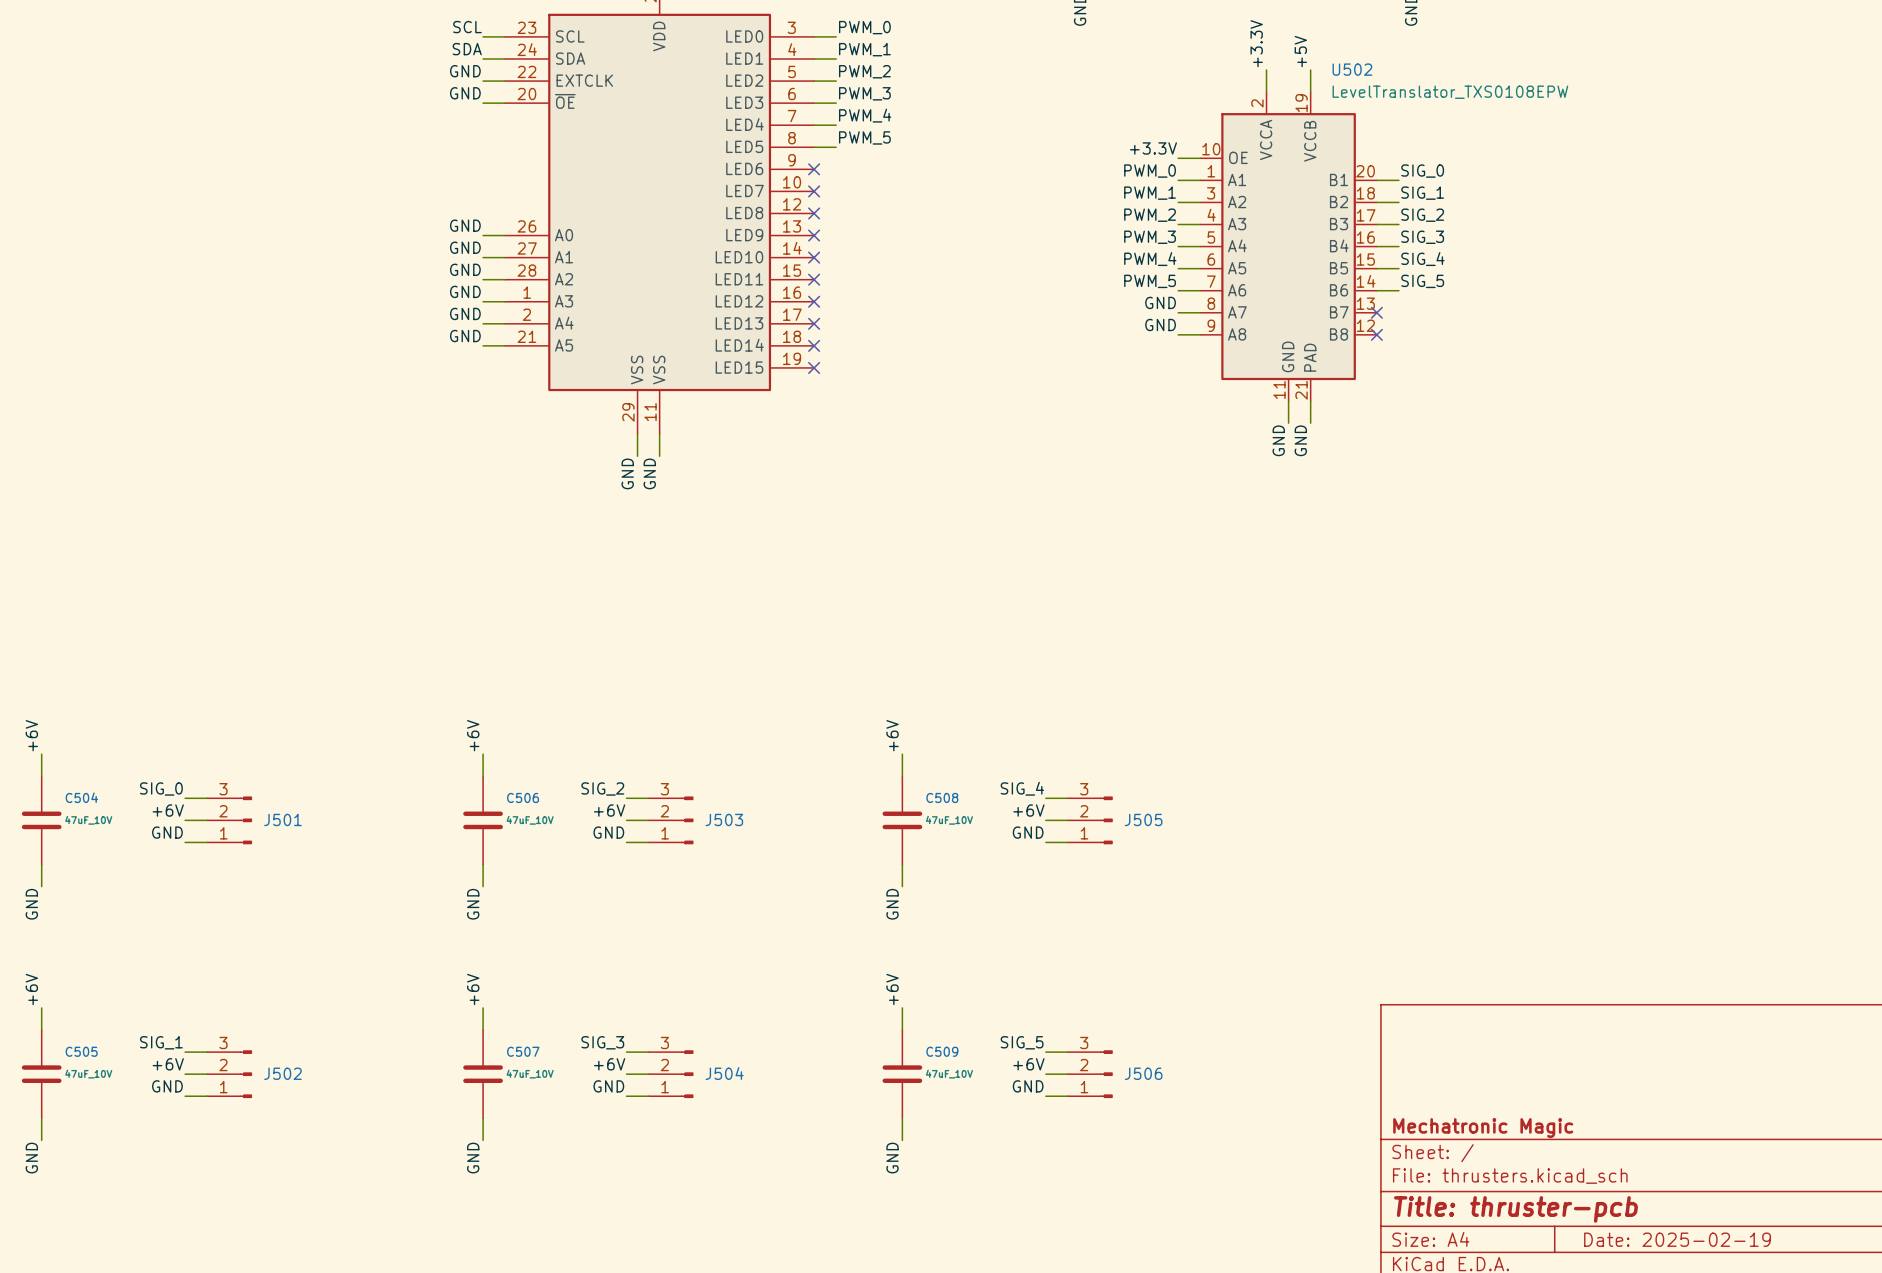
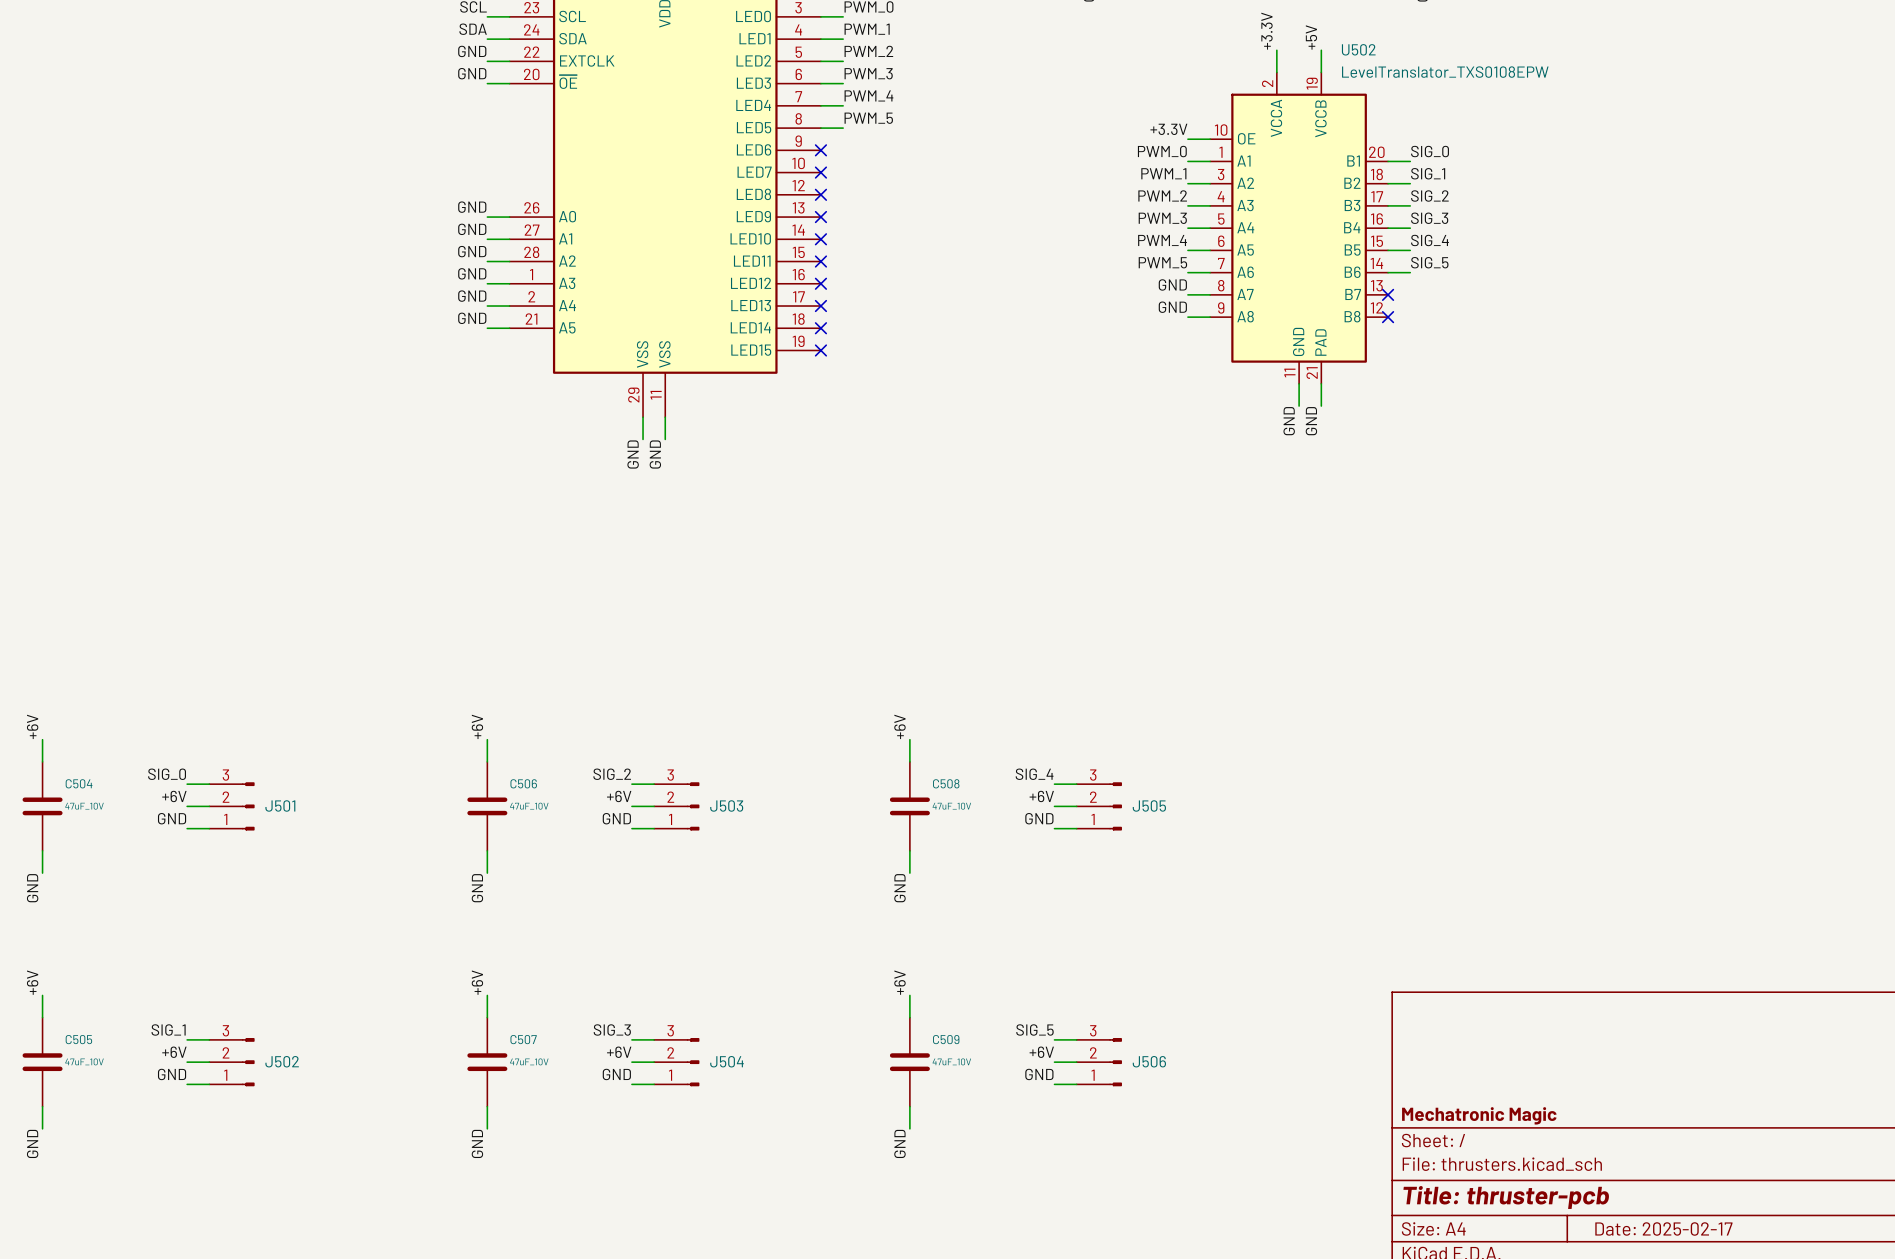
title block: Date: 2025-02-19 (1677, 1239) -> Date: 2025-02-17 (1663, 1228)

